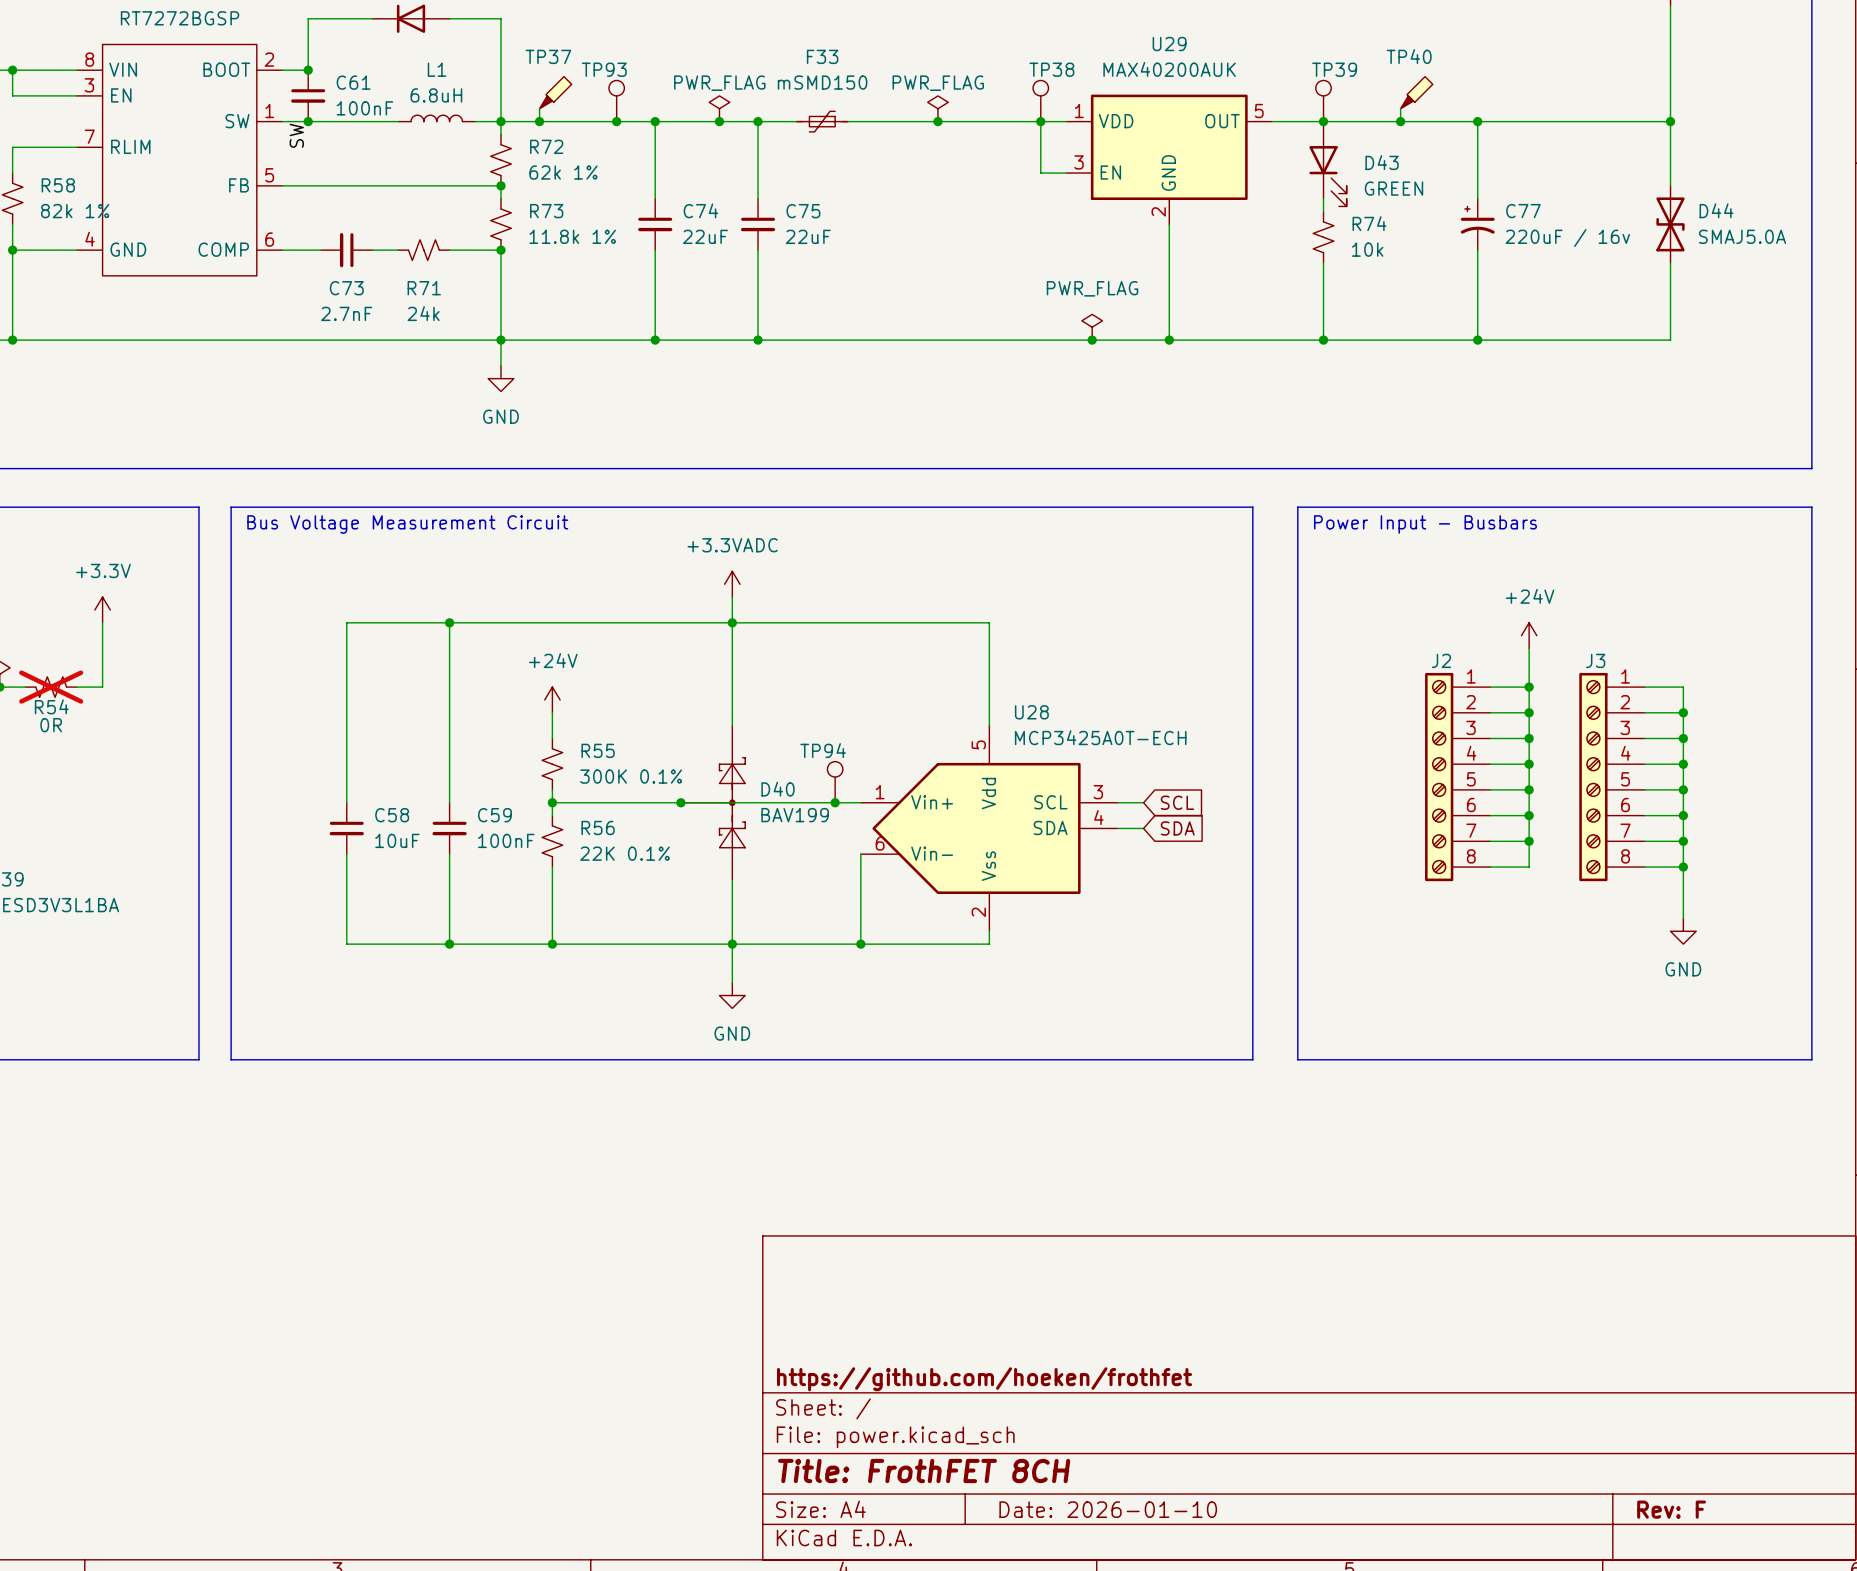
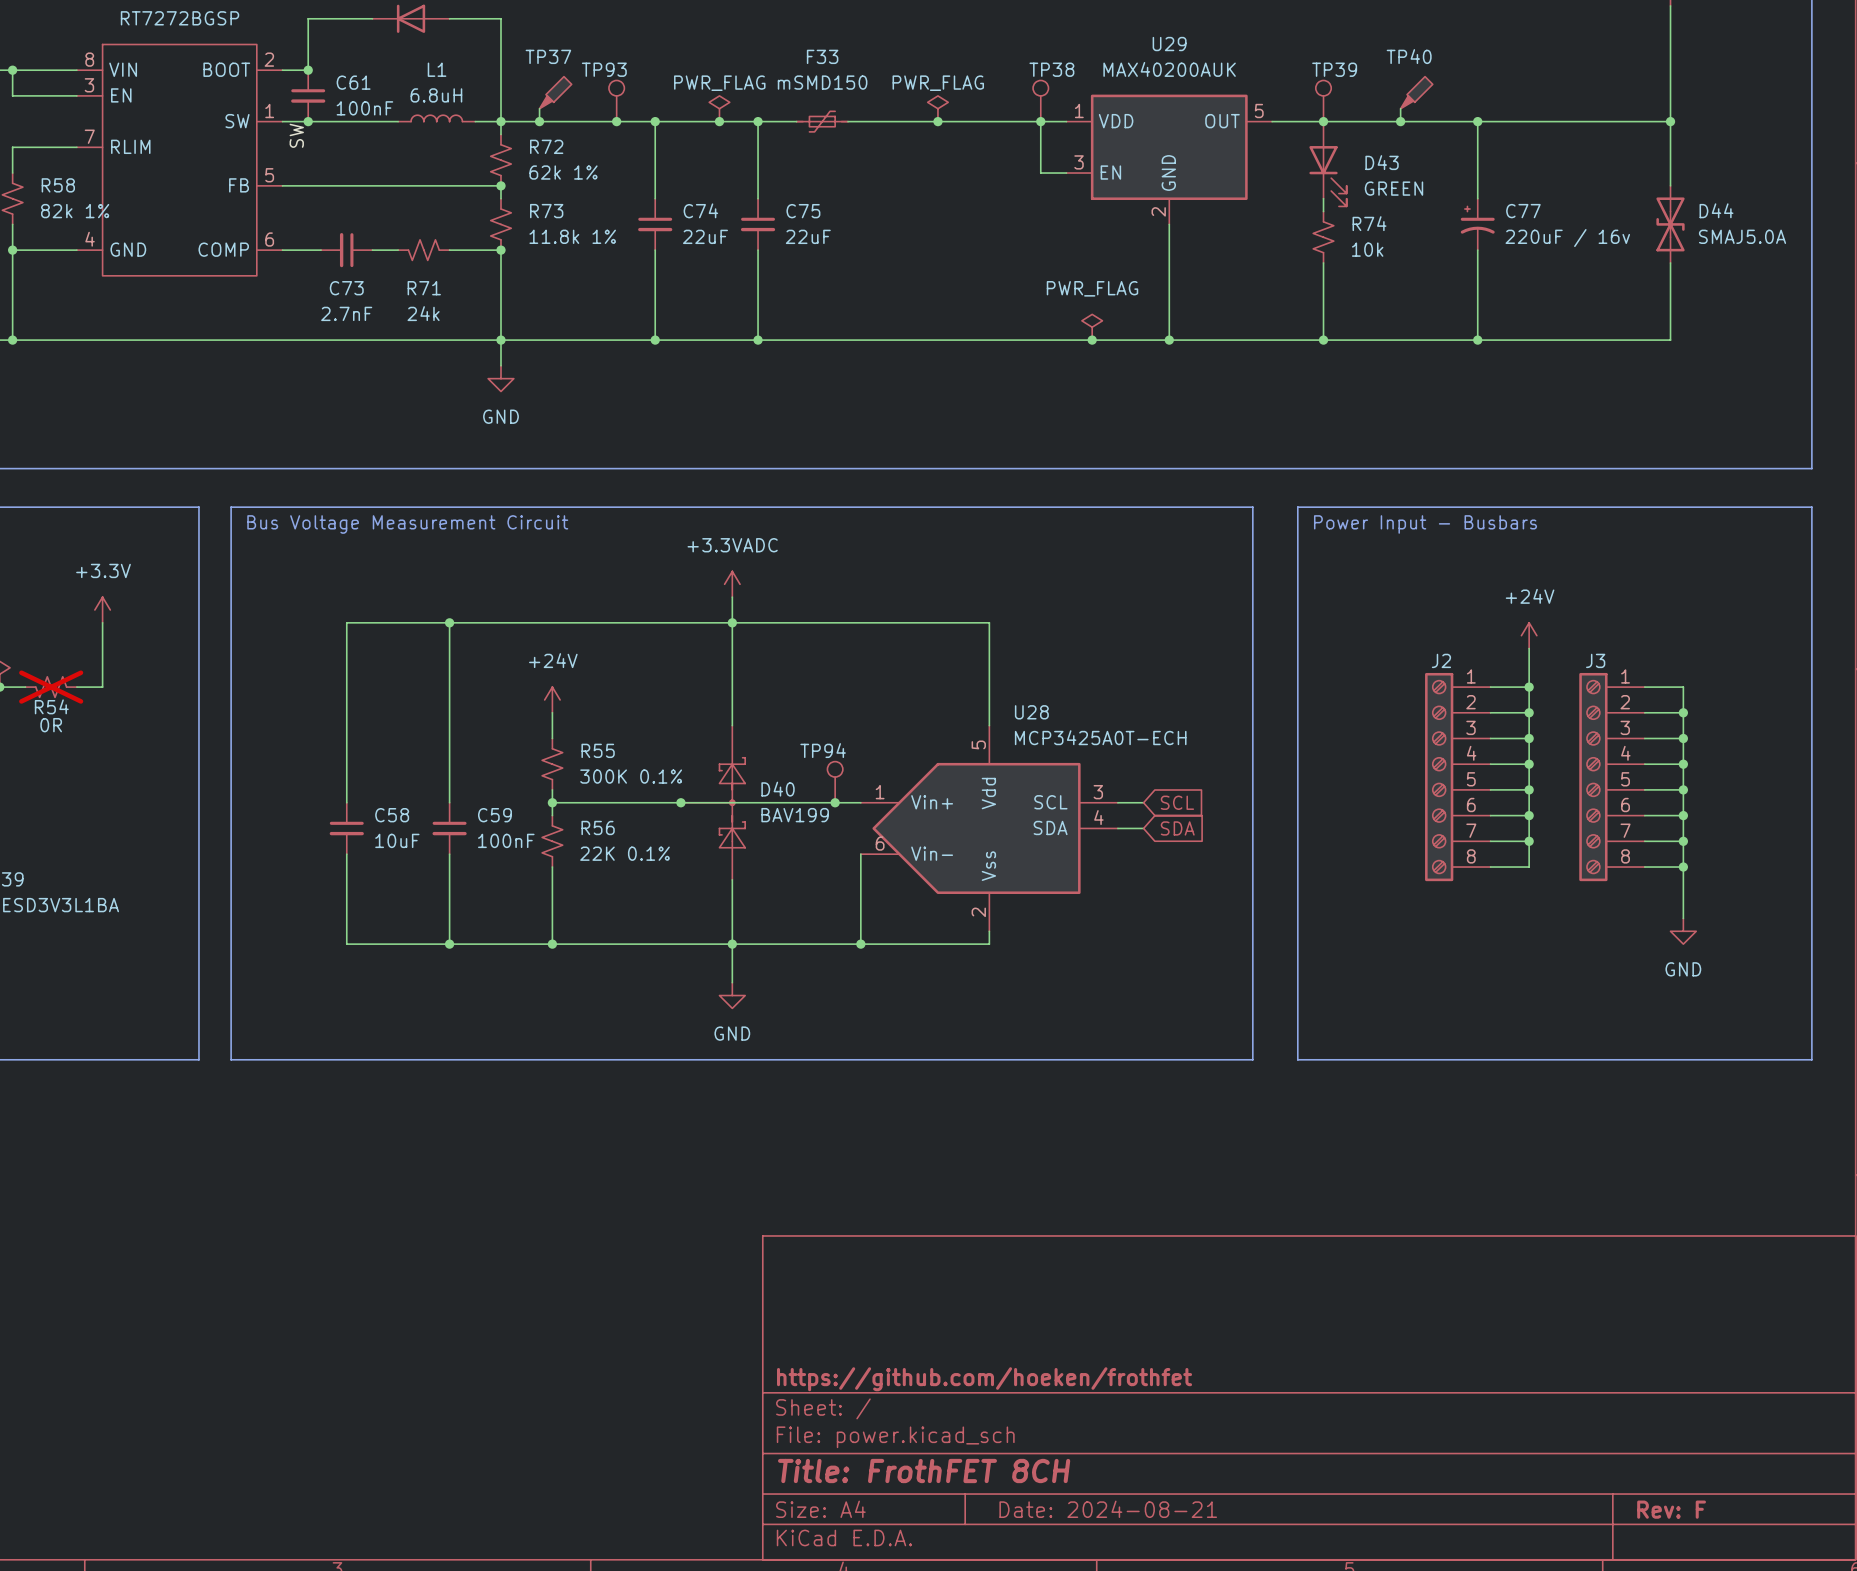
title block: Date: 2026-01-10 (1108, 1509) -> Date: 2024-08-21 (1108, 1509)

